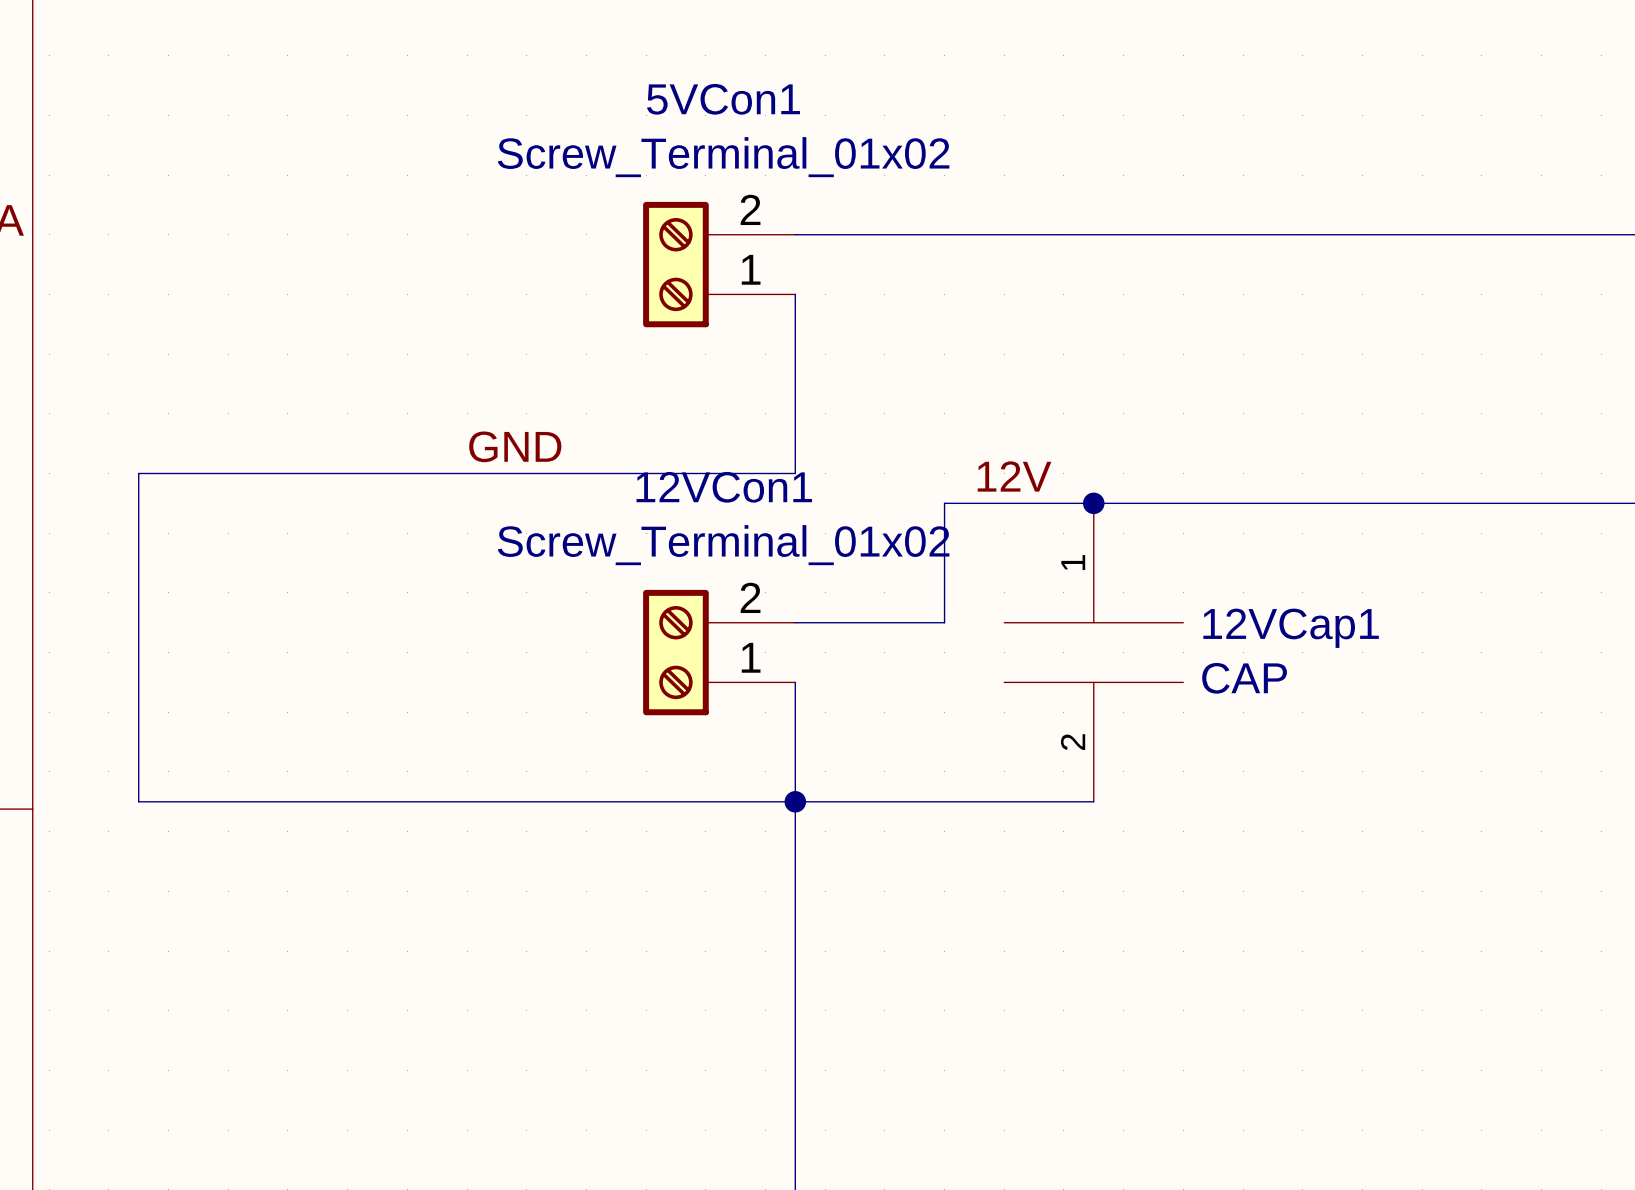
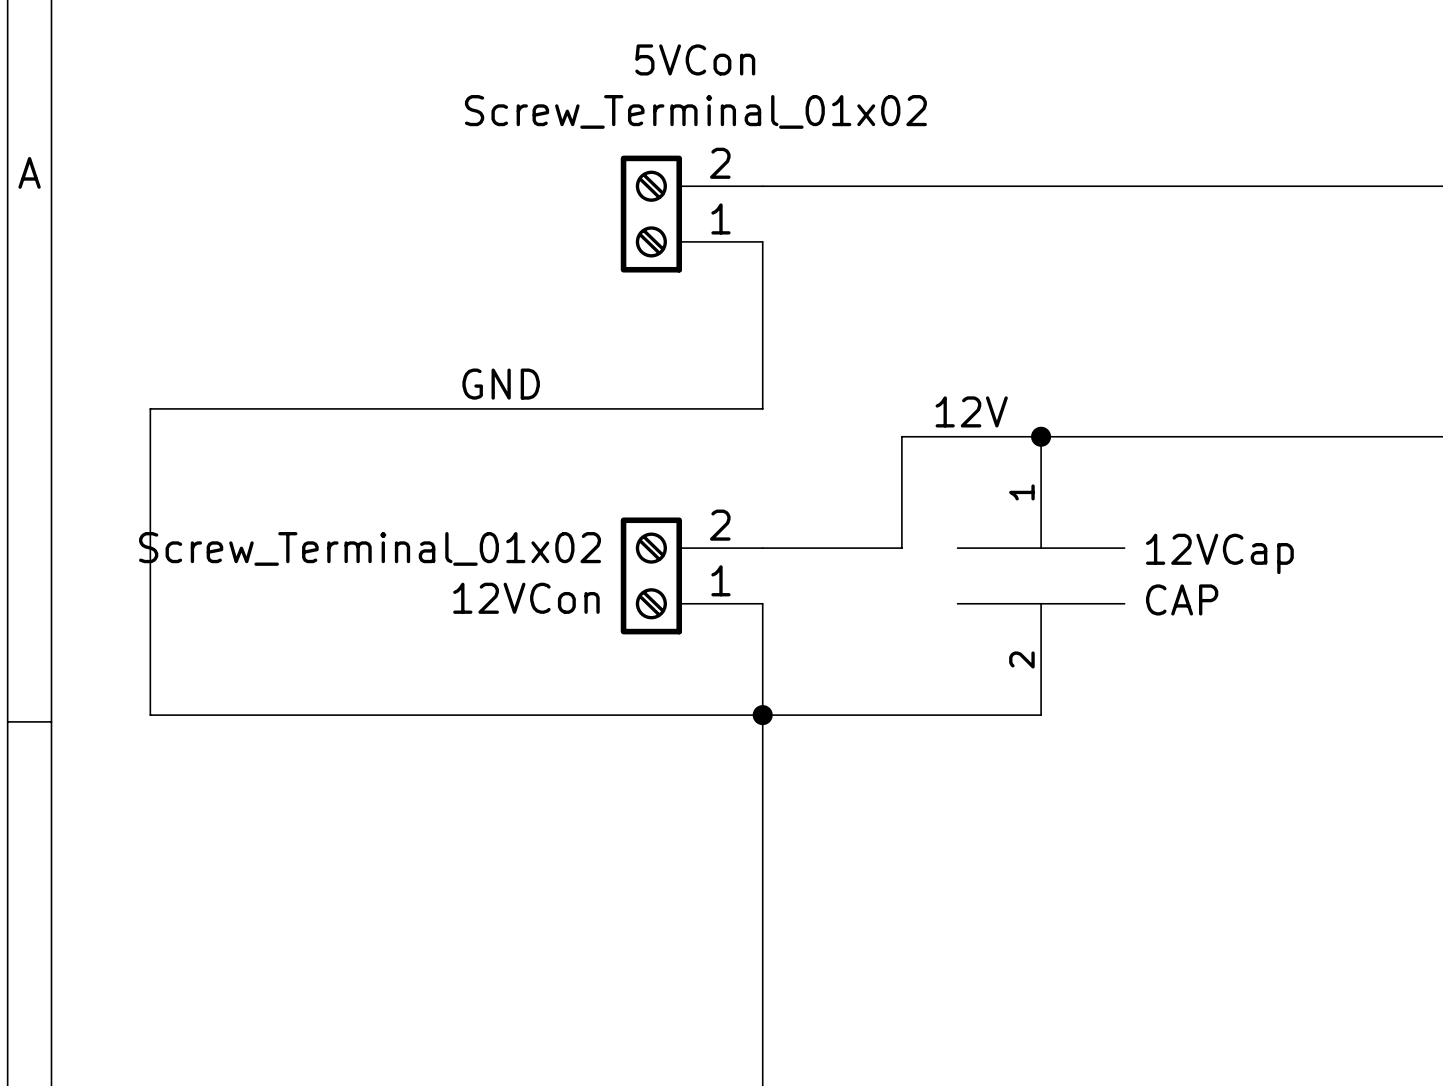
5VCon1 name: 5VCon1 (723, 99) -> 5VCon (695, 59)
12VCon1 name: 12VCon1 (724, 487) -> 12VCon (526, 598)
12VCon1 value position: Screw_Terminal_01x02 (723, 545) -> Screw_Terminal_01x02 (370, 548)
12VCap1 name: 12VCap1 (1291, 628) -> 12VCap (1219, 553)

